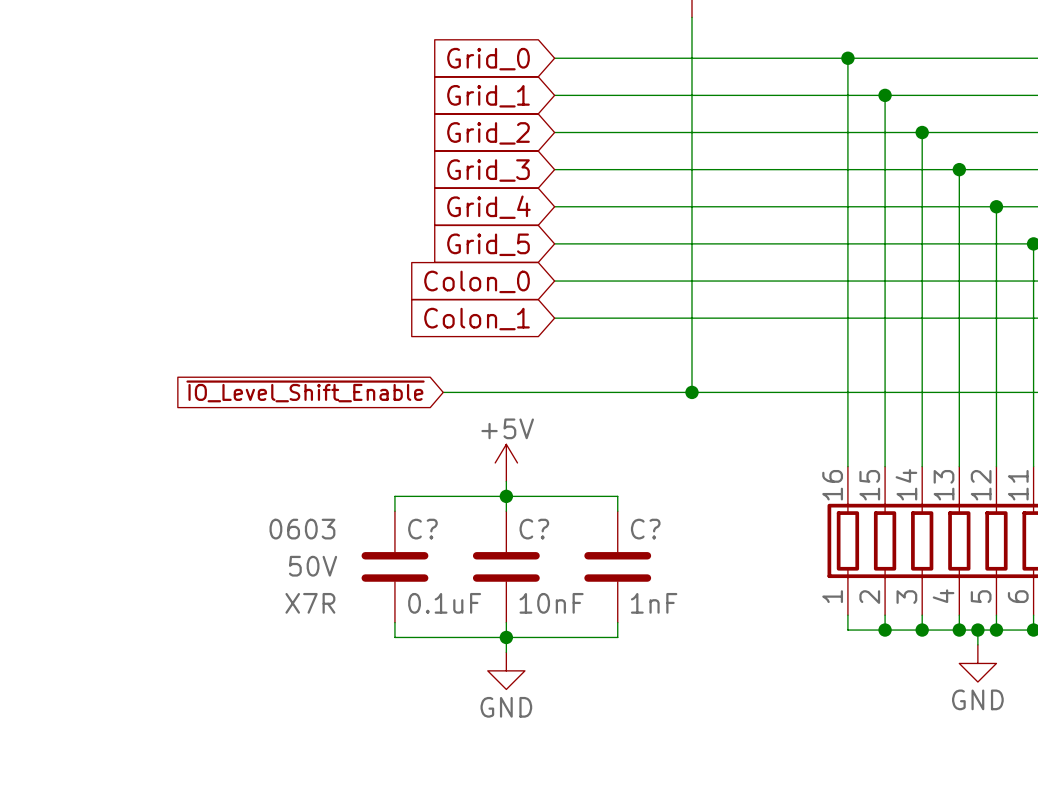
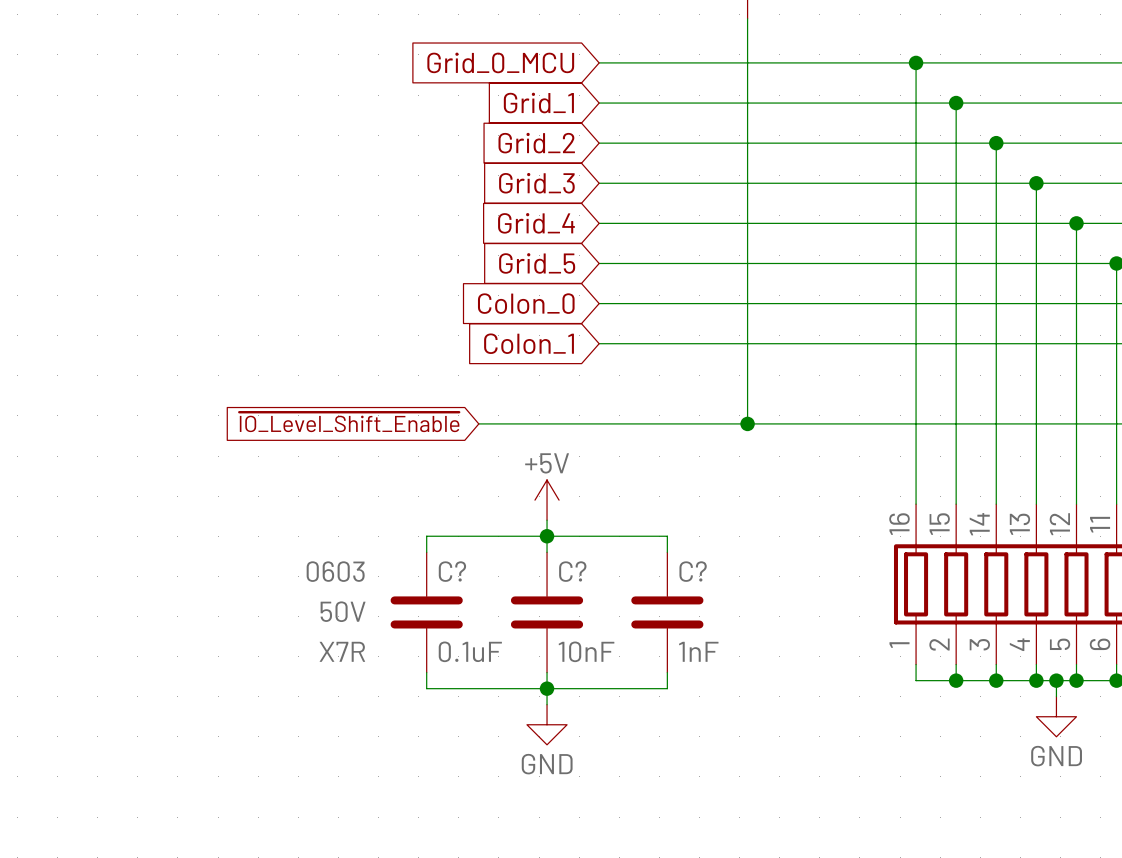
global label: Grid_0 (488, 59) -> Grid_0_MCU (500, 62)

